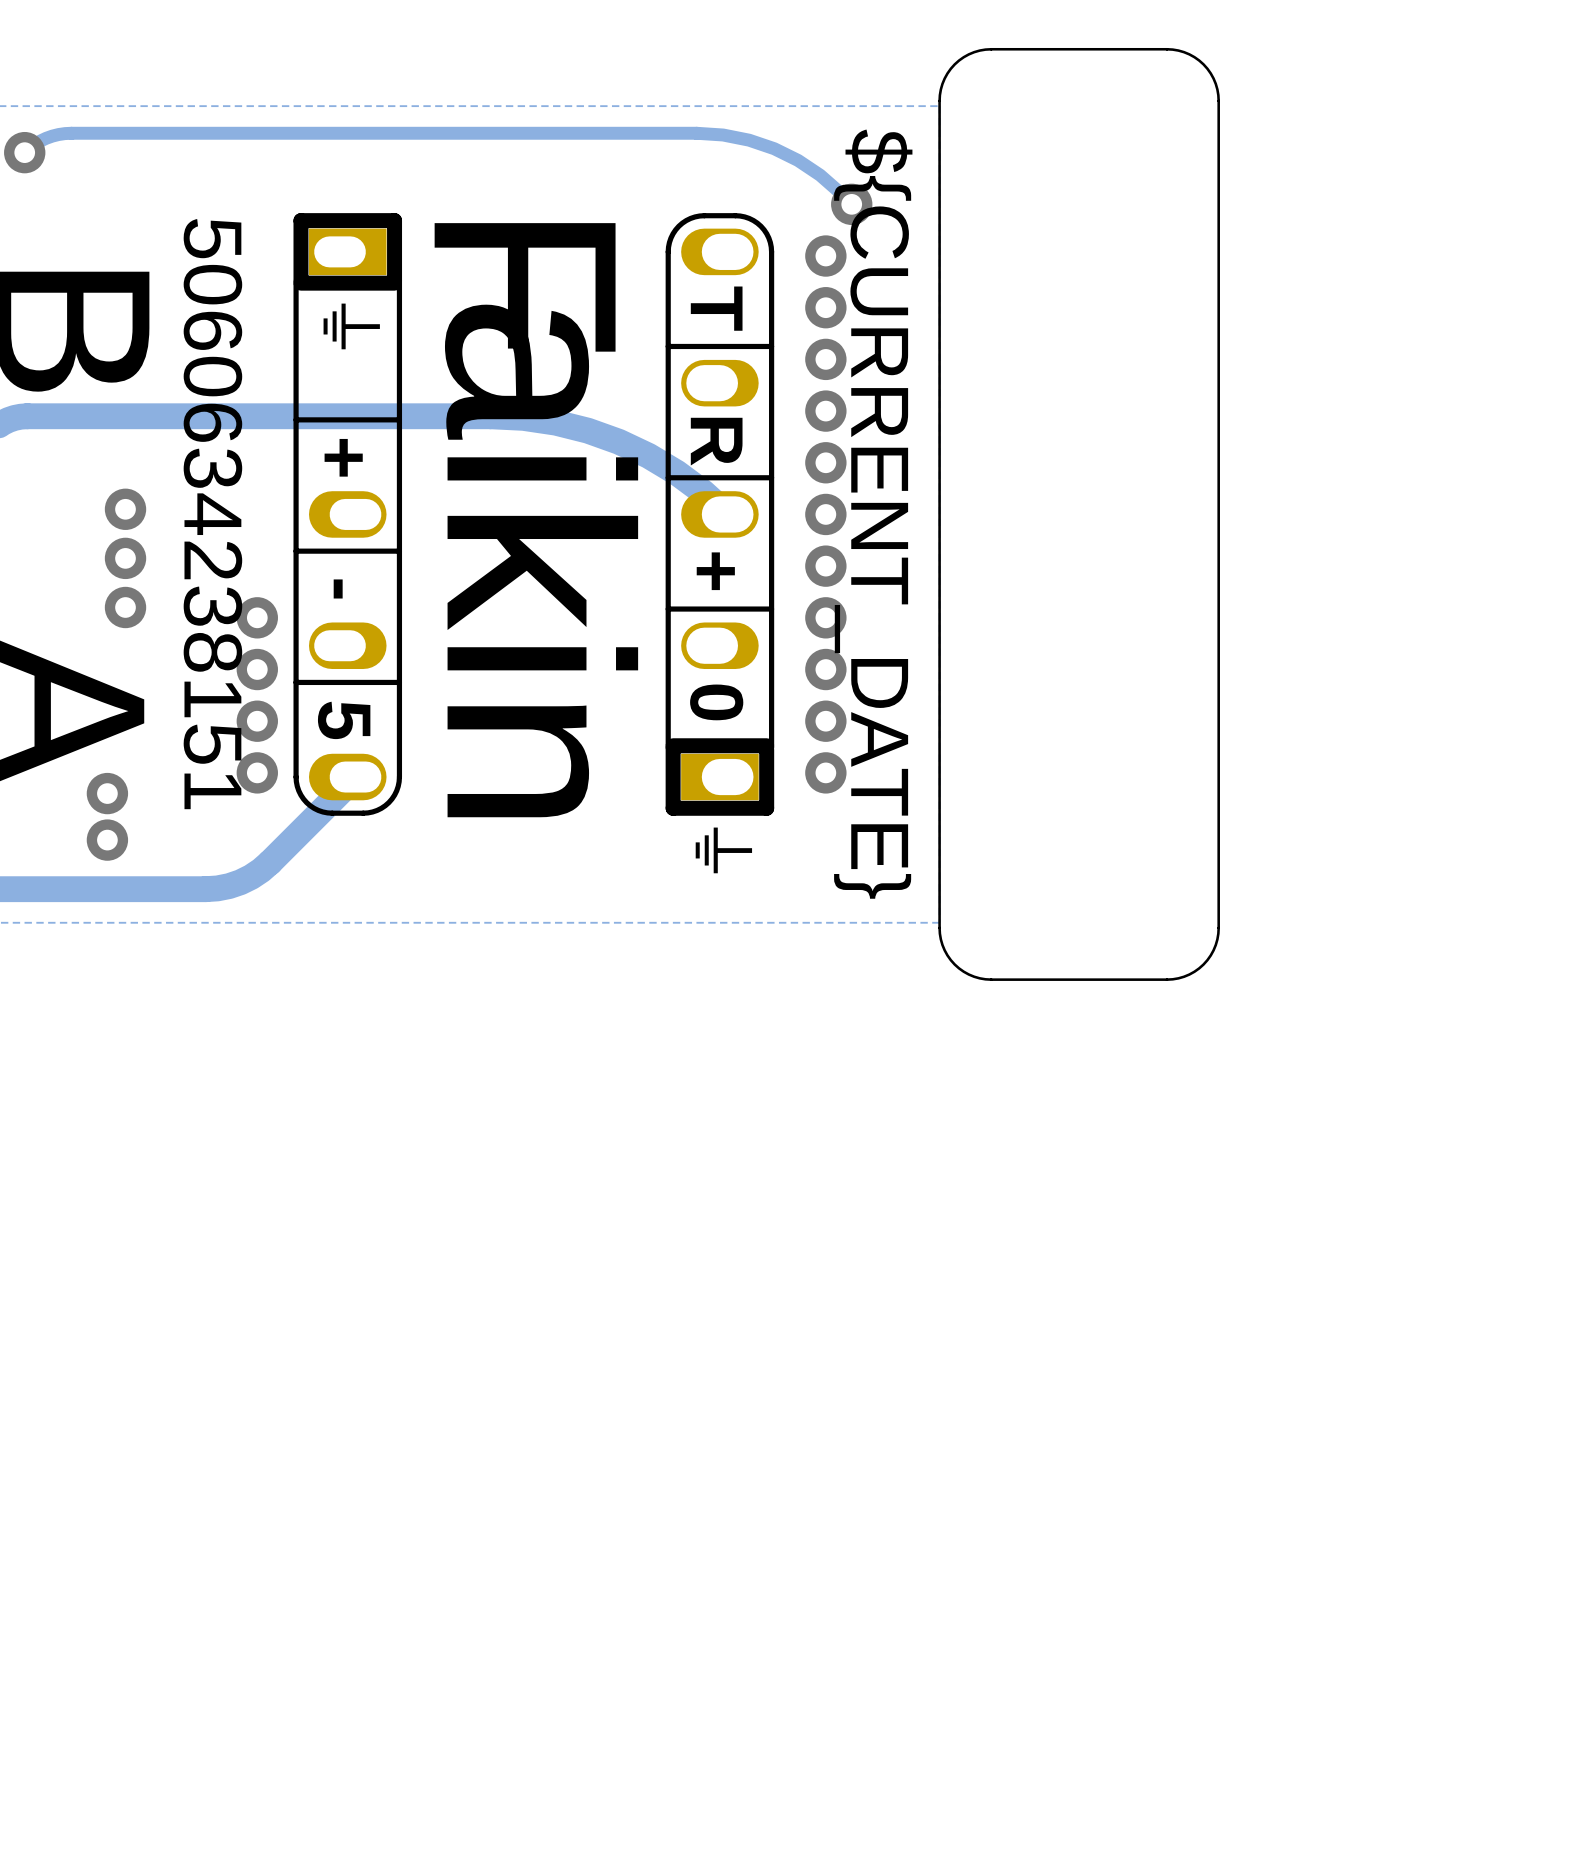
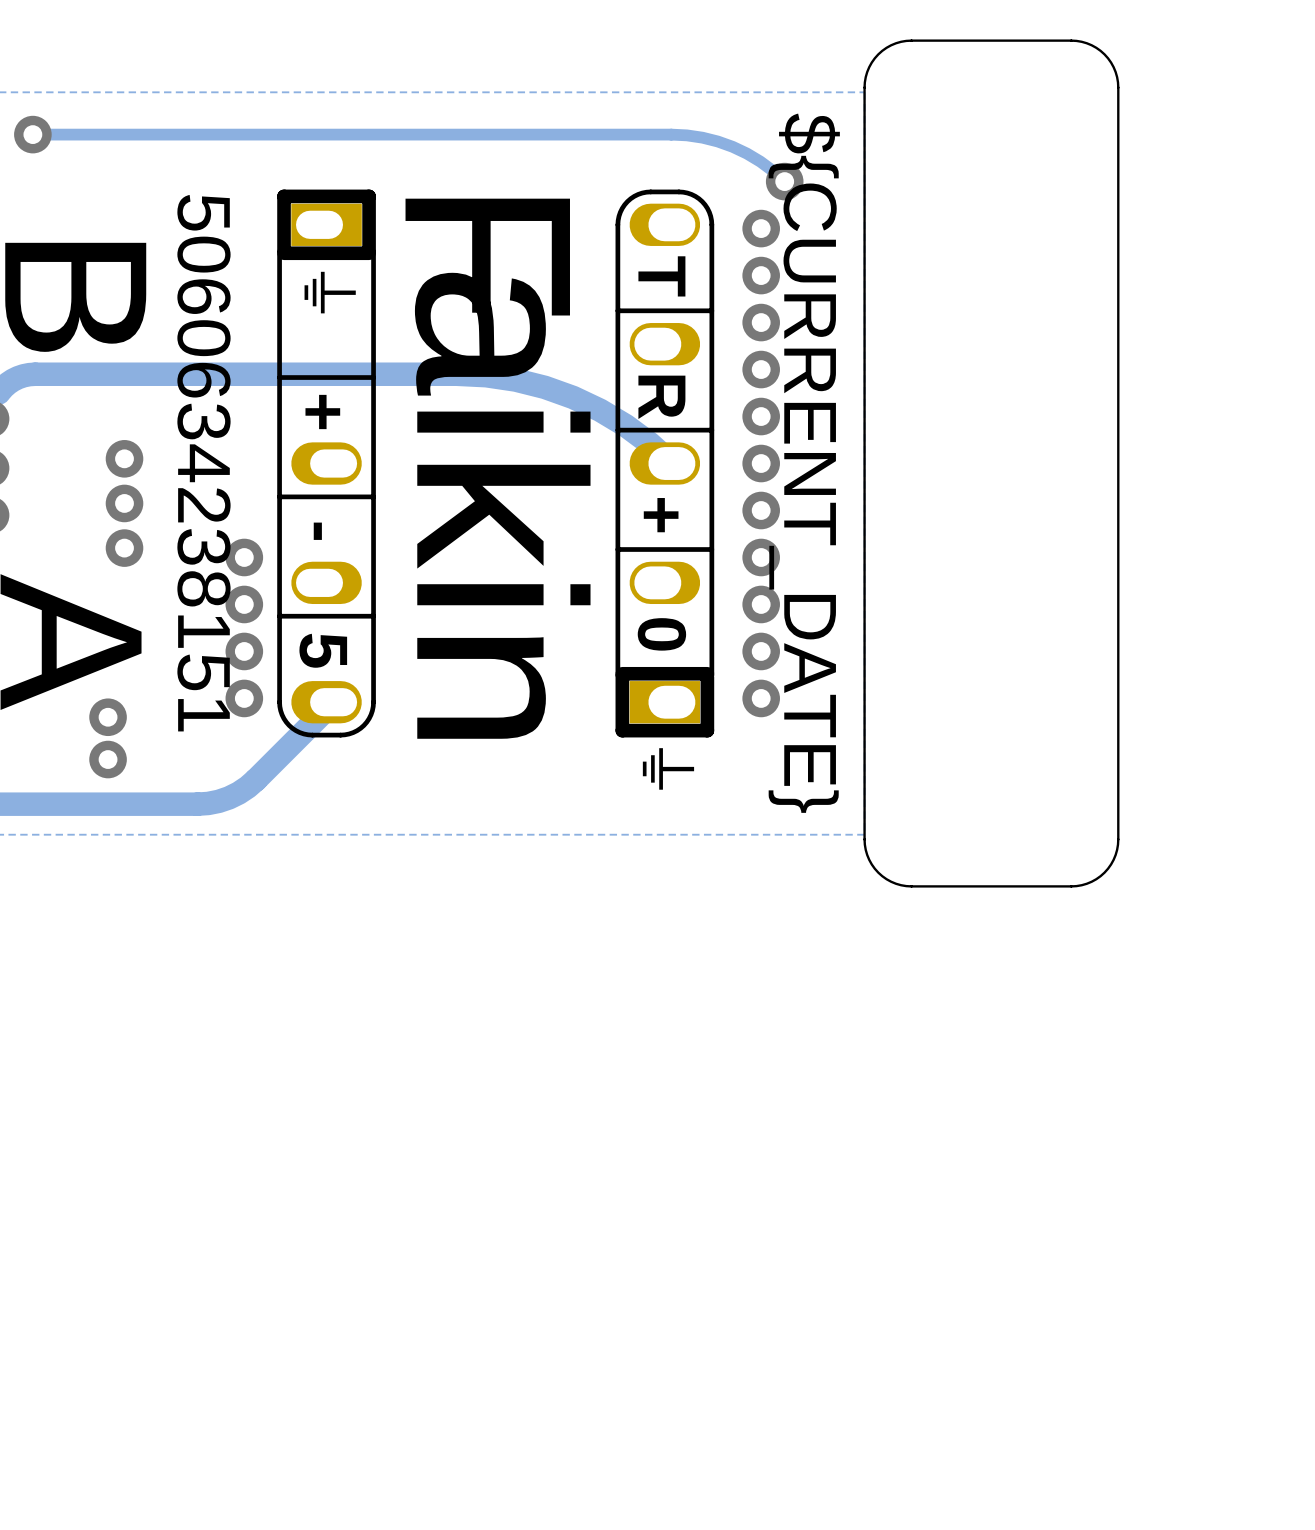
track: (24, 152) (46, 138) (71, 133) (696, 133) (723, 135) (749, 140) (774, 148) (798, 160) (820, 175) (851, 204) -> (32, 134) (686, 135) (702, 137) (732, 146) (760, 161) (784, 181)

